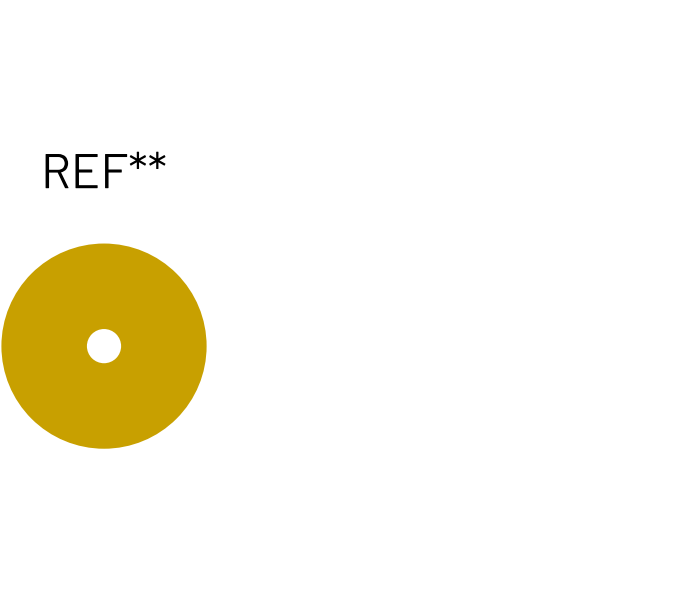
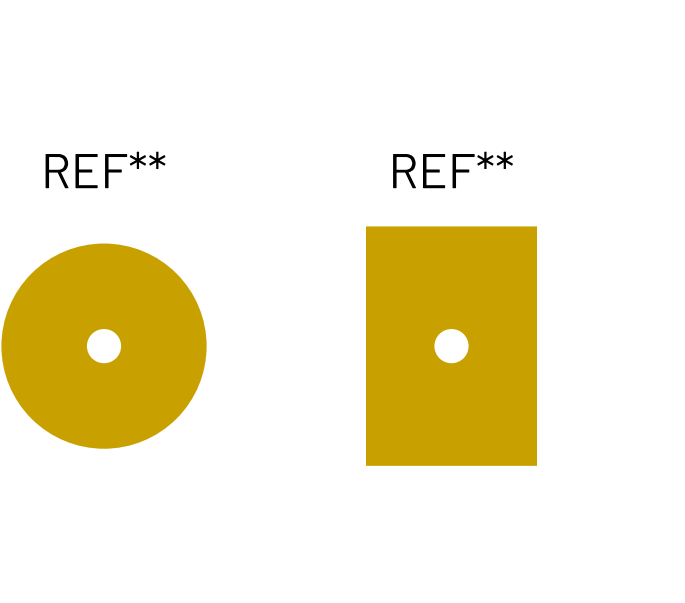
REF**: none -> (451, 346)

